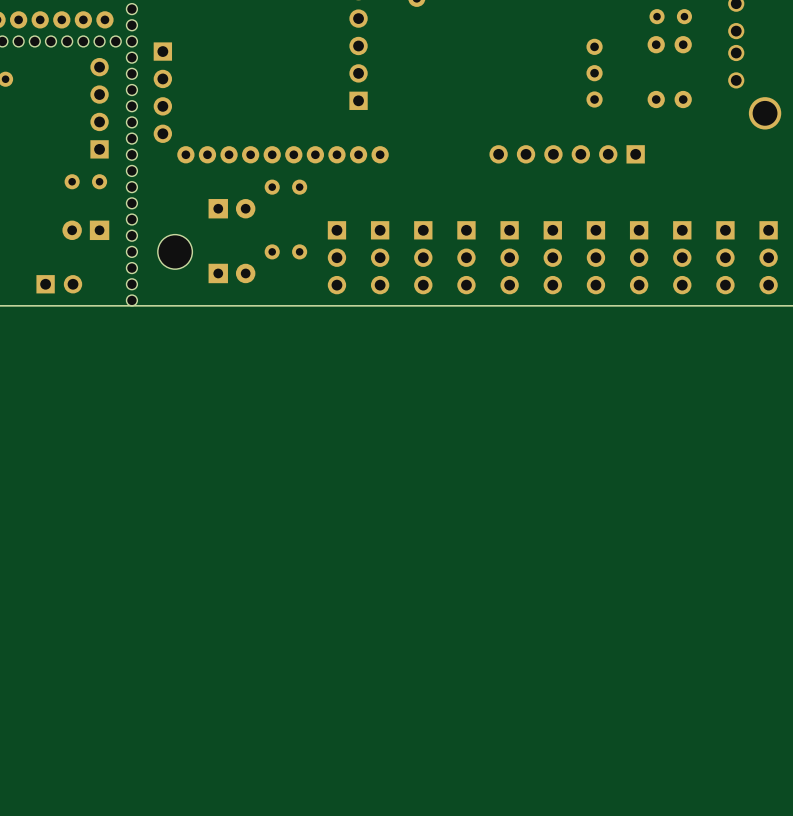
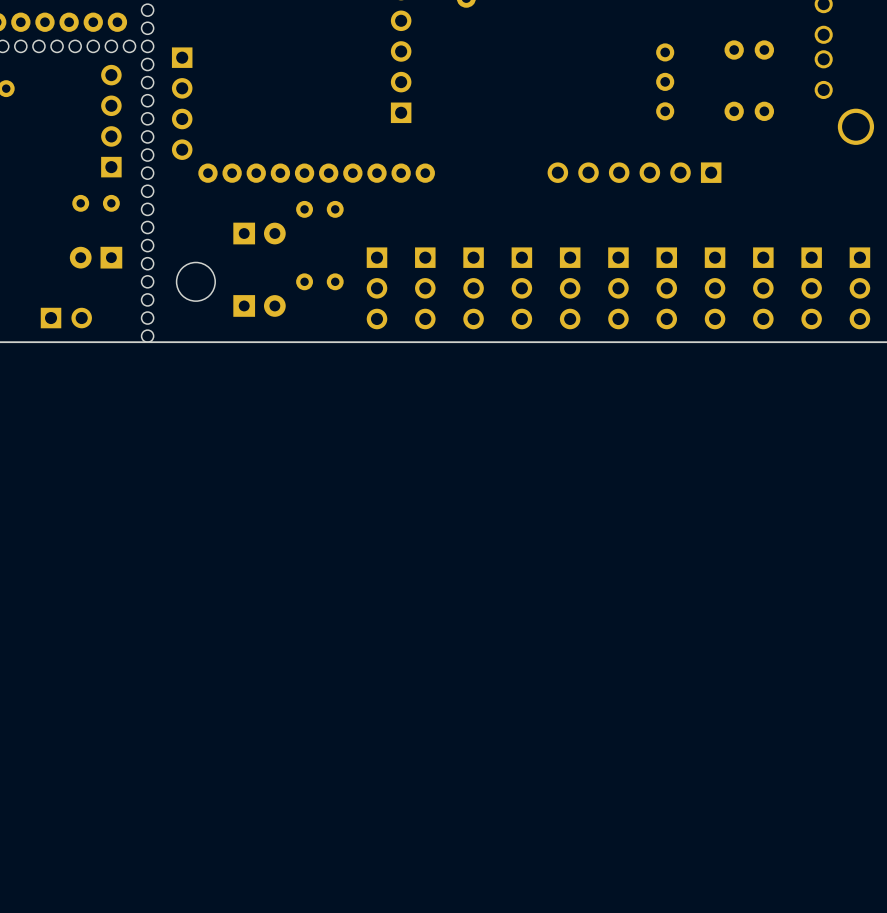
part: (670, 16) -> none

